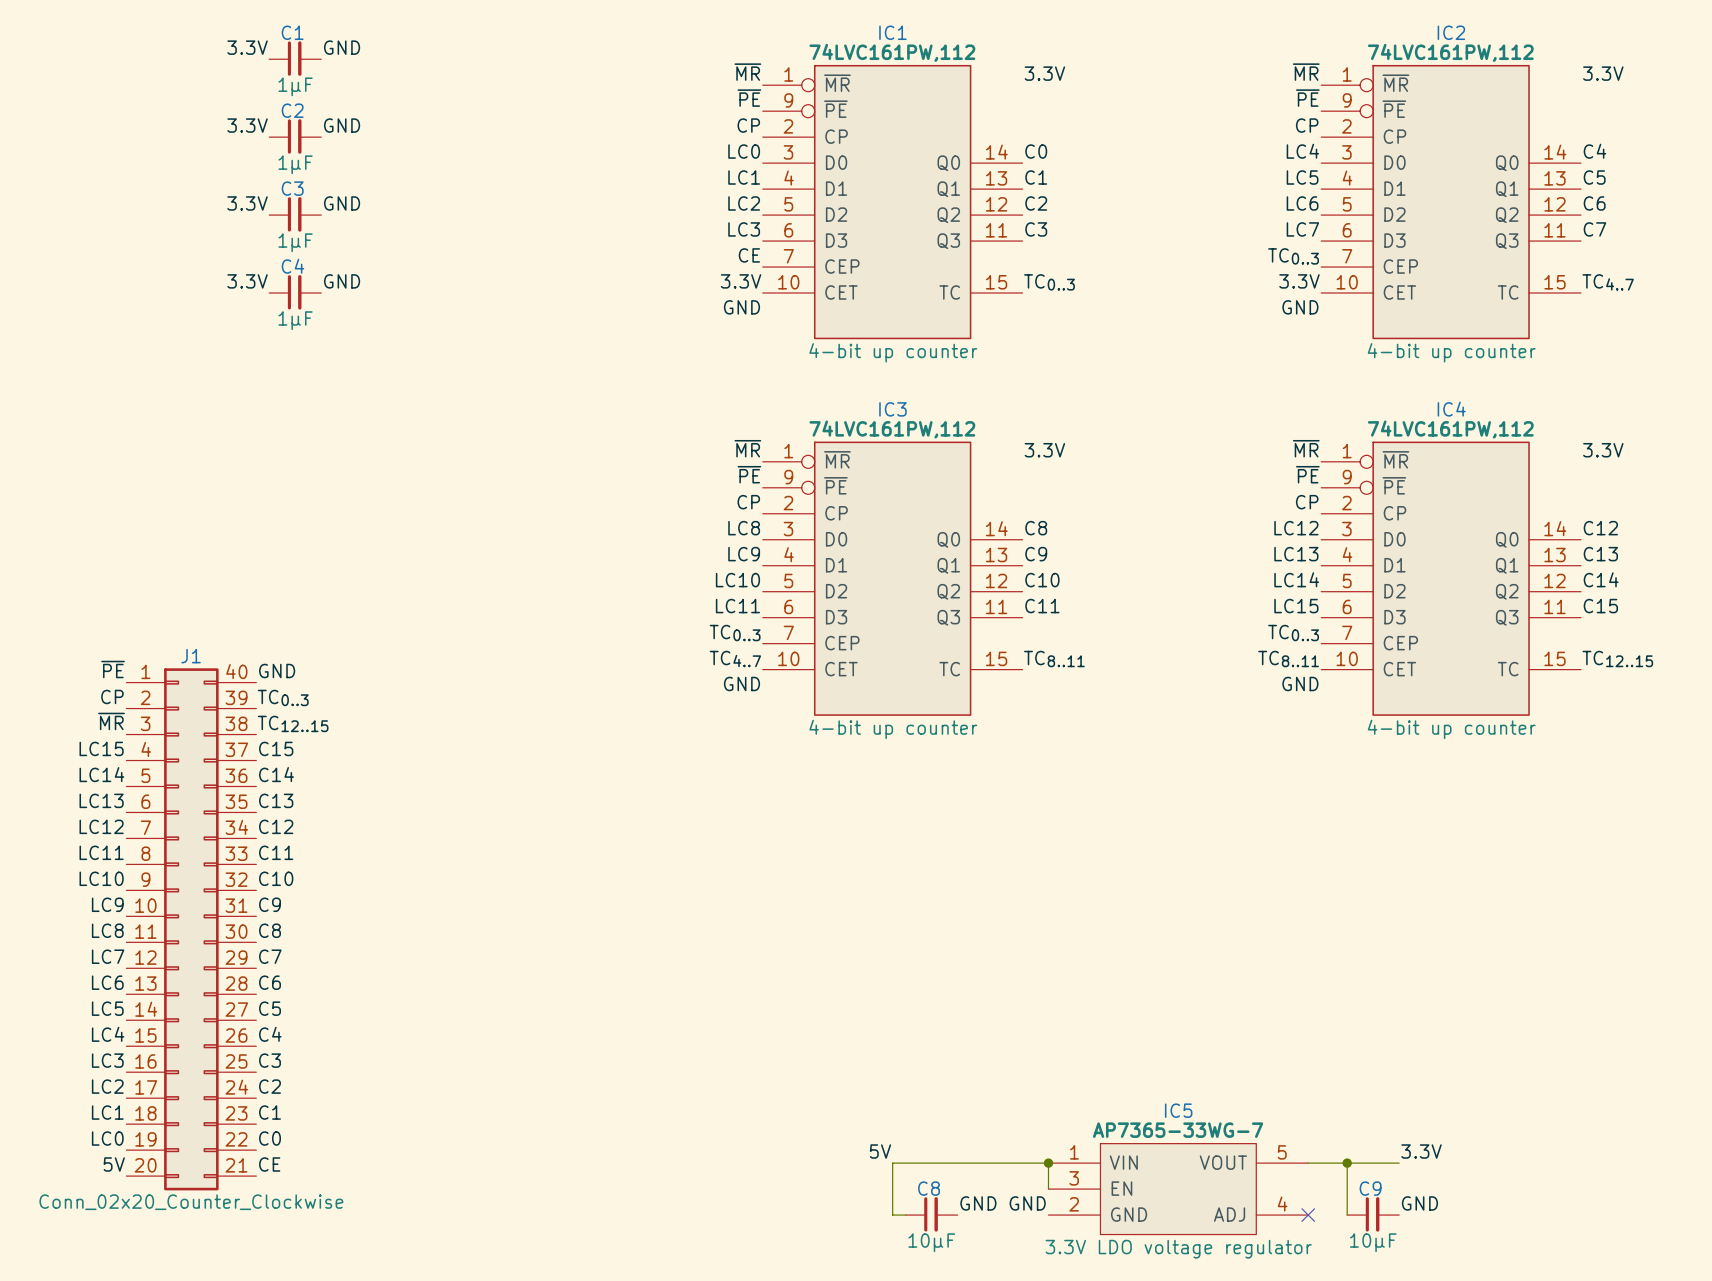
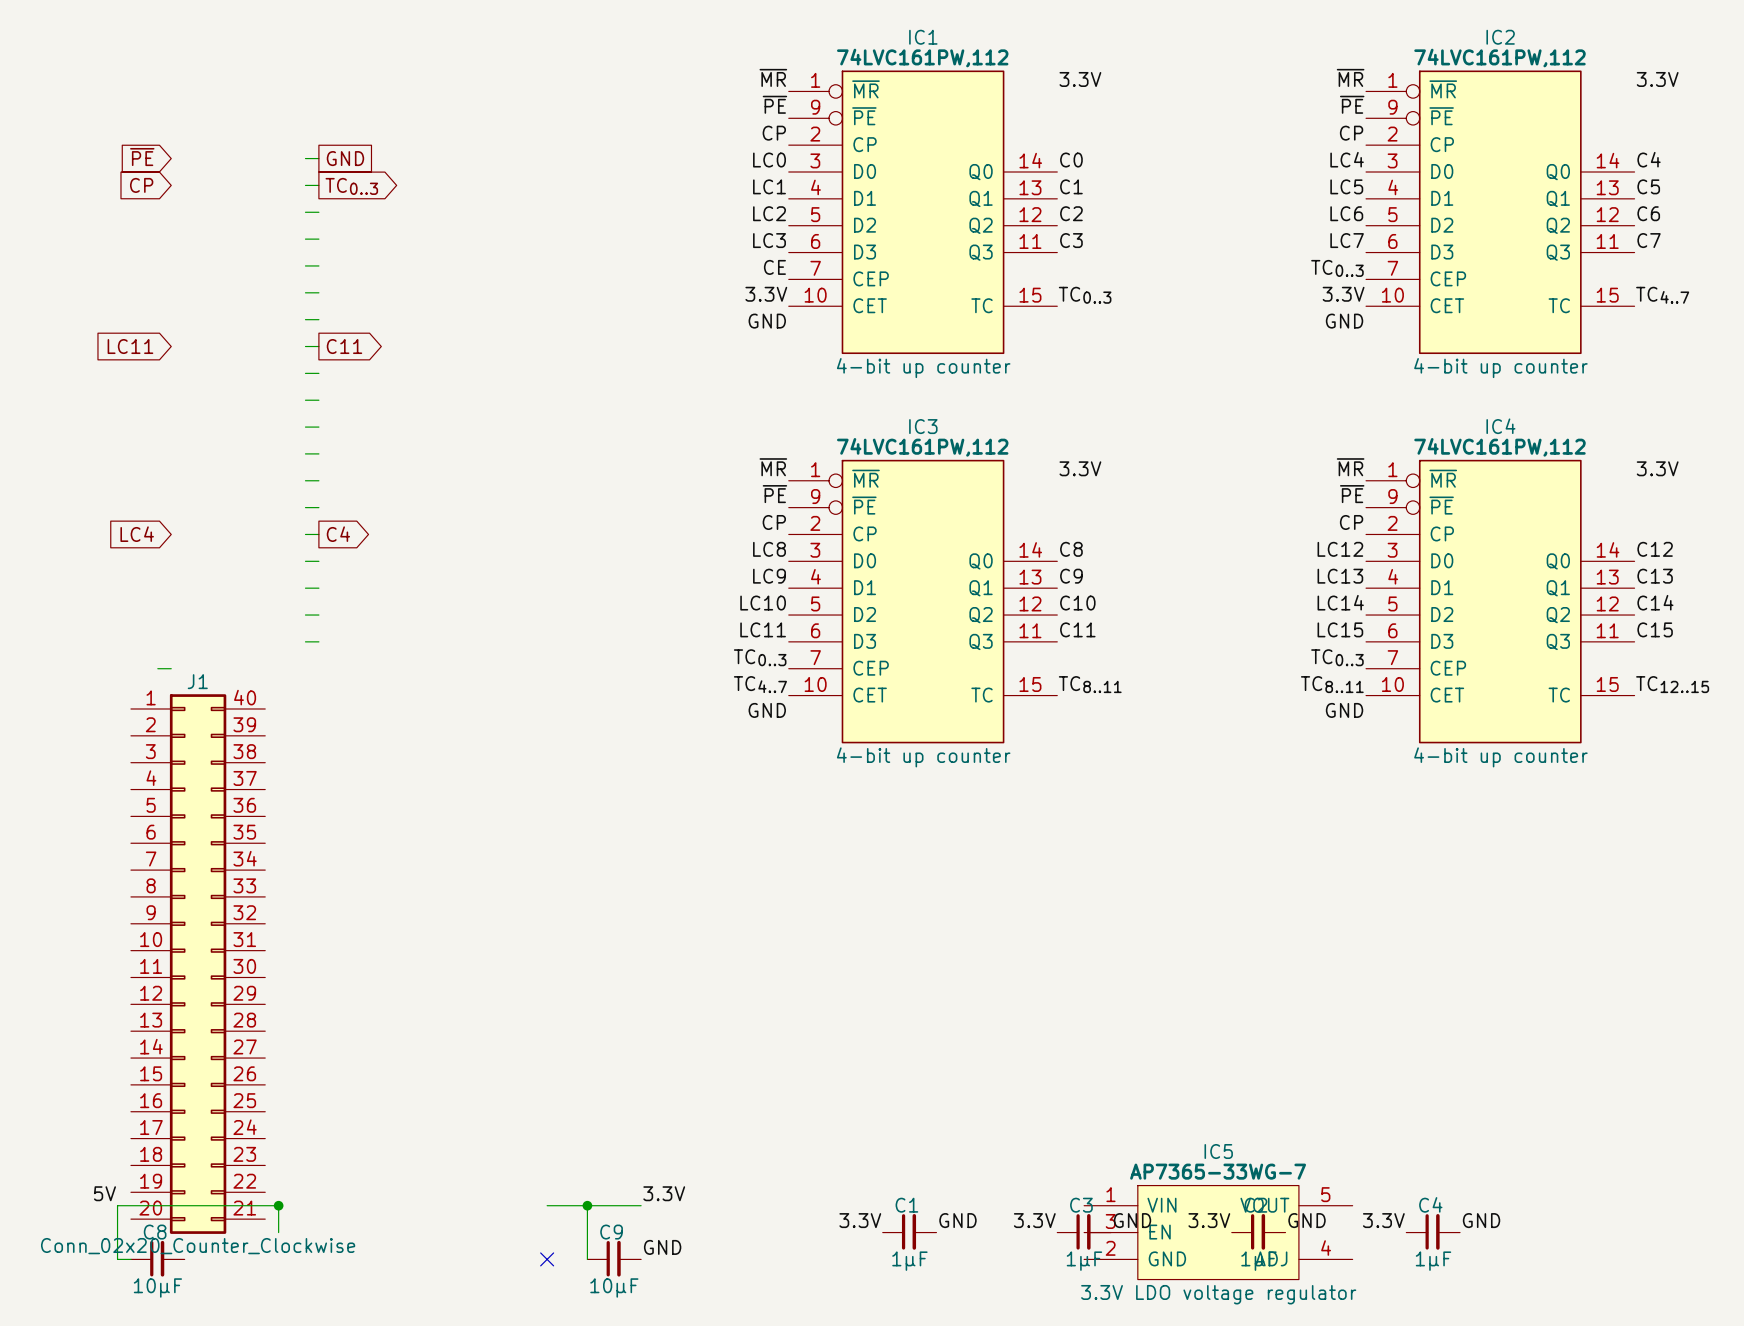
label: 3.3V (247, 47) -> none
label: GND (342, 47) -> none
C1 position: (295, 58) -> (909, 1231)
label: 3.3V (247, 125) -> none
label: GND (342, 125) -> none
C2 position: (295, 136) -> (1258, 1231)
global label: none -> ~{PE} (142, 157)
wire: none -> (305, 158) (318, 158)
global label: none -> GND (345, 158)
global label: none -> CP (141, 185)
wire: none -> (305, 185) (318, 185)
global label: none -> TC0..3 (351, 186)
wire: none -> (305, 212) (318, 212)
label: 3.3V (247, 203) -> none
label: GND (342, 203) -> none
C3 position: (295, 214) -> (1084, 1231)
wire: none -> (305, 239) (318, 239)
wire: none -> (305, 265) (318, 265)
wire: none -> (305, 292) (318, 292)
label: 3.3V (247, 281) -> none
label: GND (342, 281) -> none
C4 position: (295, 292) -> (1433, 1231)
wire: none -> (305, 319) (318, 319)
global label: none -> LC11 (130, 346)
wire: none -> (305, 346) (318, 346)
global label: none -> C11 (344, 346)
wire: none -> (305, 373) (318, 373)
wire: none -> (305, 400) (318, 400)
wire: none -> (305, 427) (318, 427)
wire: none -> (305, 453) (318, 453)
wire: none -> (305, 480) (318, 480)
wire: none -> (305, 507) (318, 507)
global label: none -> LC4 (137, 534)
wire: none -> (305, 534) (318, 534)
global label: none -> C4 (338, 534)
wire: none -> (305, 561) (318, 561)
wire: none -> (305, 588) (318, 588)
wire: none -> (305, 615) (318, 615)
wire: none -> (305, 641) (318, 641)
wire: none -> (157, 668) (171, 668)
label: ~{PE} (113, 669) -> none
label: GND (277, 671) -> none
label: CP (112, 696) -> none
label: TC0..3 (283, 697) -> none
label: ~{MR} (111, 721) -> none
label: TC12..15 (293, 723) -> none
label: LC15 (101, 748) -> none
label: C15 (276, 748) -> none
label: LC14 (101, 774) -> none
label: C14 (276, 774) -> none
label: LC13 (101, 800) -> none
label: C13 (276, 800) -> none
label: LC12 (101, 826) -> none
label: C12 (276, 826) -> none
label: LC11 (101, 852) -> none
label: C11 (276, 852) -> none
label: LC10 (101, 878) -> none
label: C10 (276, 878) -> none
label: LC9 (107, 904) -> none
label: C9 (270, 904) -> none
label: LC8 (107, 930) -> none
label: C8 (270, 930) -> none
label: LC7 (108, 956) -> none
label: C7 (270, 956) -> none
label: LC6 (107, 982) -> none
label: C6 (270, 982) -> none
label: LC5 (107, 1008) -> none
label: C5 (270, 1008) -> none
label: LC4 (108, 1034) -> none
label: C4 (270, 1034) -> none
label: LC3 (107, 1060) -> none
label: C3 (270, 1060) -> none
label: LC2 (107, 1086) -> none
label: C2 (270, 1086) -> none
label: LC1 (107, 1112) -> none
label: C1 (270, 1112) -> none
label: LC0 (107, 1138) -> none
label: C0 (270, 1138) -> none
label: none -> 3.3V (664, 1193)
label: 5V (880, 1151) -> none
label position: 3.3V (1421, 1151) -> 3.3V (1383, 1220)
junction: none -> (278, 1205)
wire: none -> (547, 1205) (641, 1205)
wire: none -> (587, 1205) (587, 1259)
junction: none -> (587, 1205)
junction: (1048, 1163) -> none
wire: (1308, 1163) (1399, 1163) -> none
wire: (1347, 1163) (1347, 1215) -> none
junction: (1347, 1163) -> none
label position: 5V (114, 1164) -> 5V (104, 1193)
label: CE (269, 1164) -> none
label: none -> 3.3V (860, 1220)
label: none -> 3.3V (1034, 1220)
label: none -> 3.3V (1209, 1220)
label: none -> GND (1307, 1220)
wire: none -> (278, 1232) (278, 1205) (117, 1205) (117, 1259) (130, 1259)
wire: (1048, 1189) (1048, 1163) (892, 1163) (892, 1215) (905, 1215) -> none
label: none -> GND (662, 1247)
label position: GND (978, 1203) -> GND (957, 1220)
label position: GND (1027, 1203) -> GND (1132, 1220)
label position: GND (1419, 1203) -> GND (1481, 1220)
C8 position: (931, 1214) -> (157, 1258)
C9 position: (1373, 1214) -> (614, 1258)
no-connect mark: none -> (547, 1259)
no-connect mark: (1308, 1215) -> none

